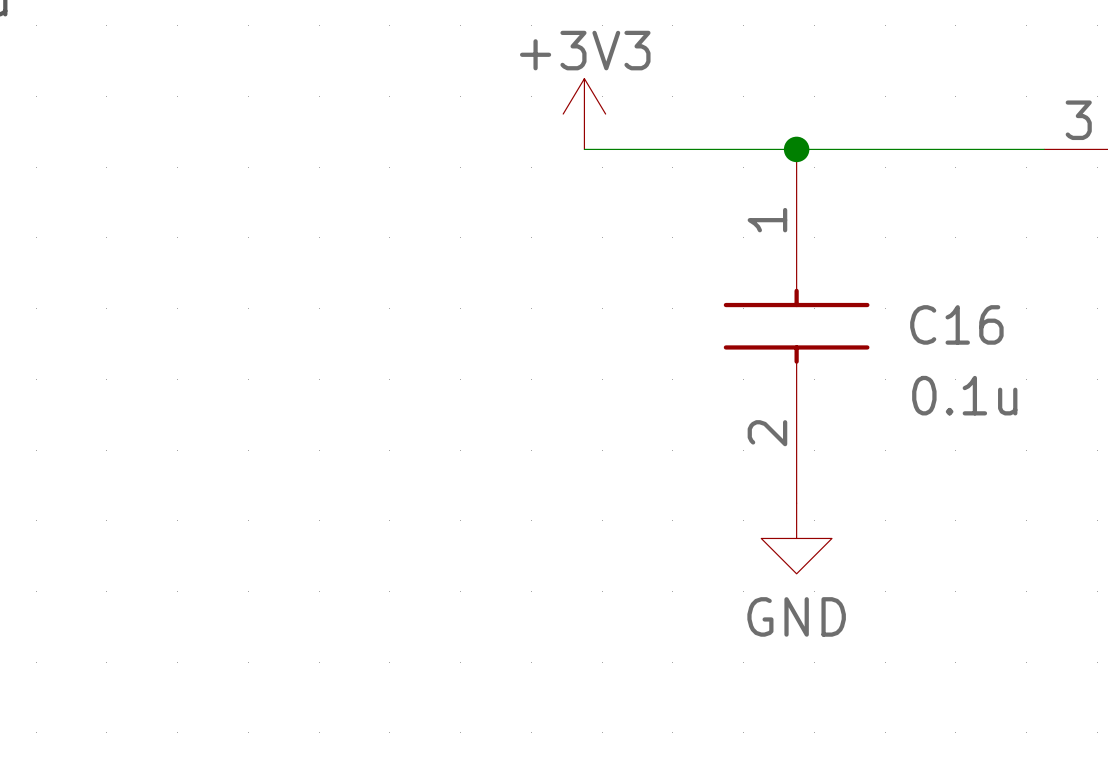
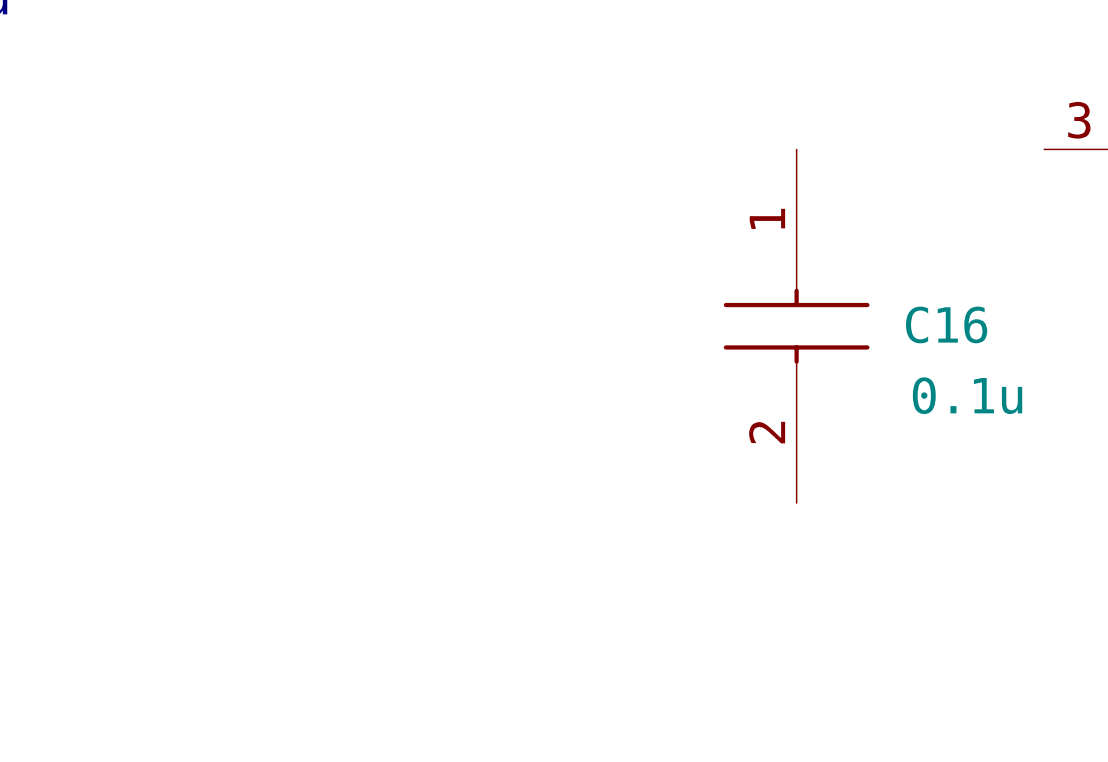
power symbol: +3V3 (584, 114) -> none
wire: (584, 149) (1044, 149) -> none
junction: (796, 149) -> none
power symbol: GND (796, 538) -> none

